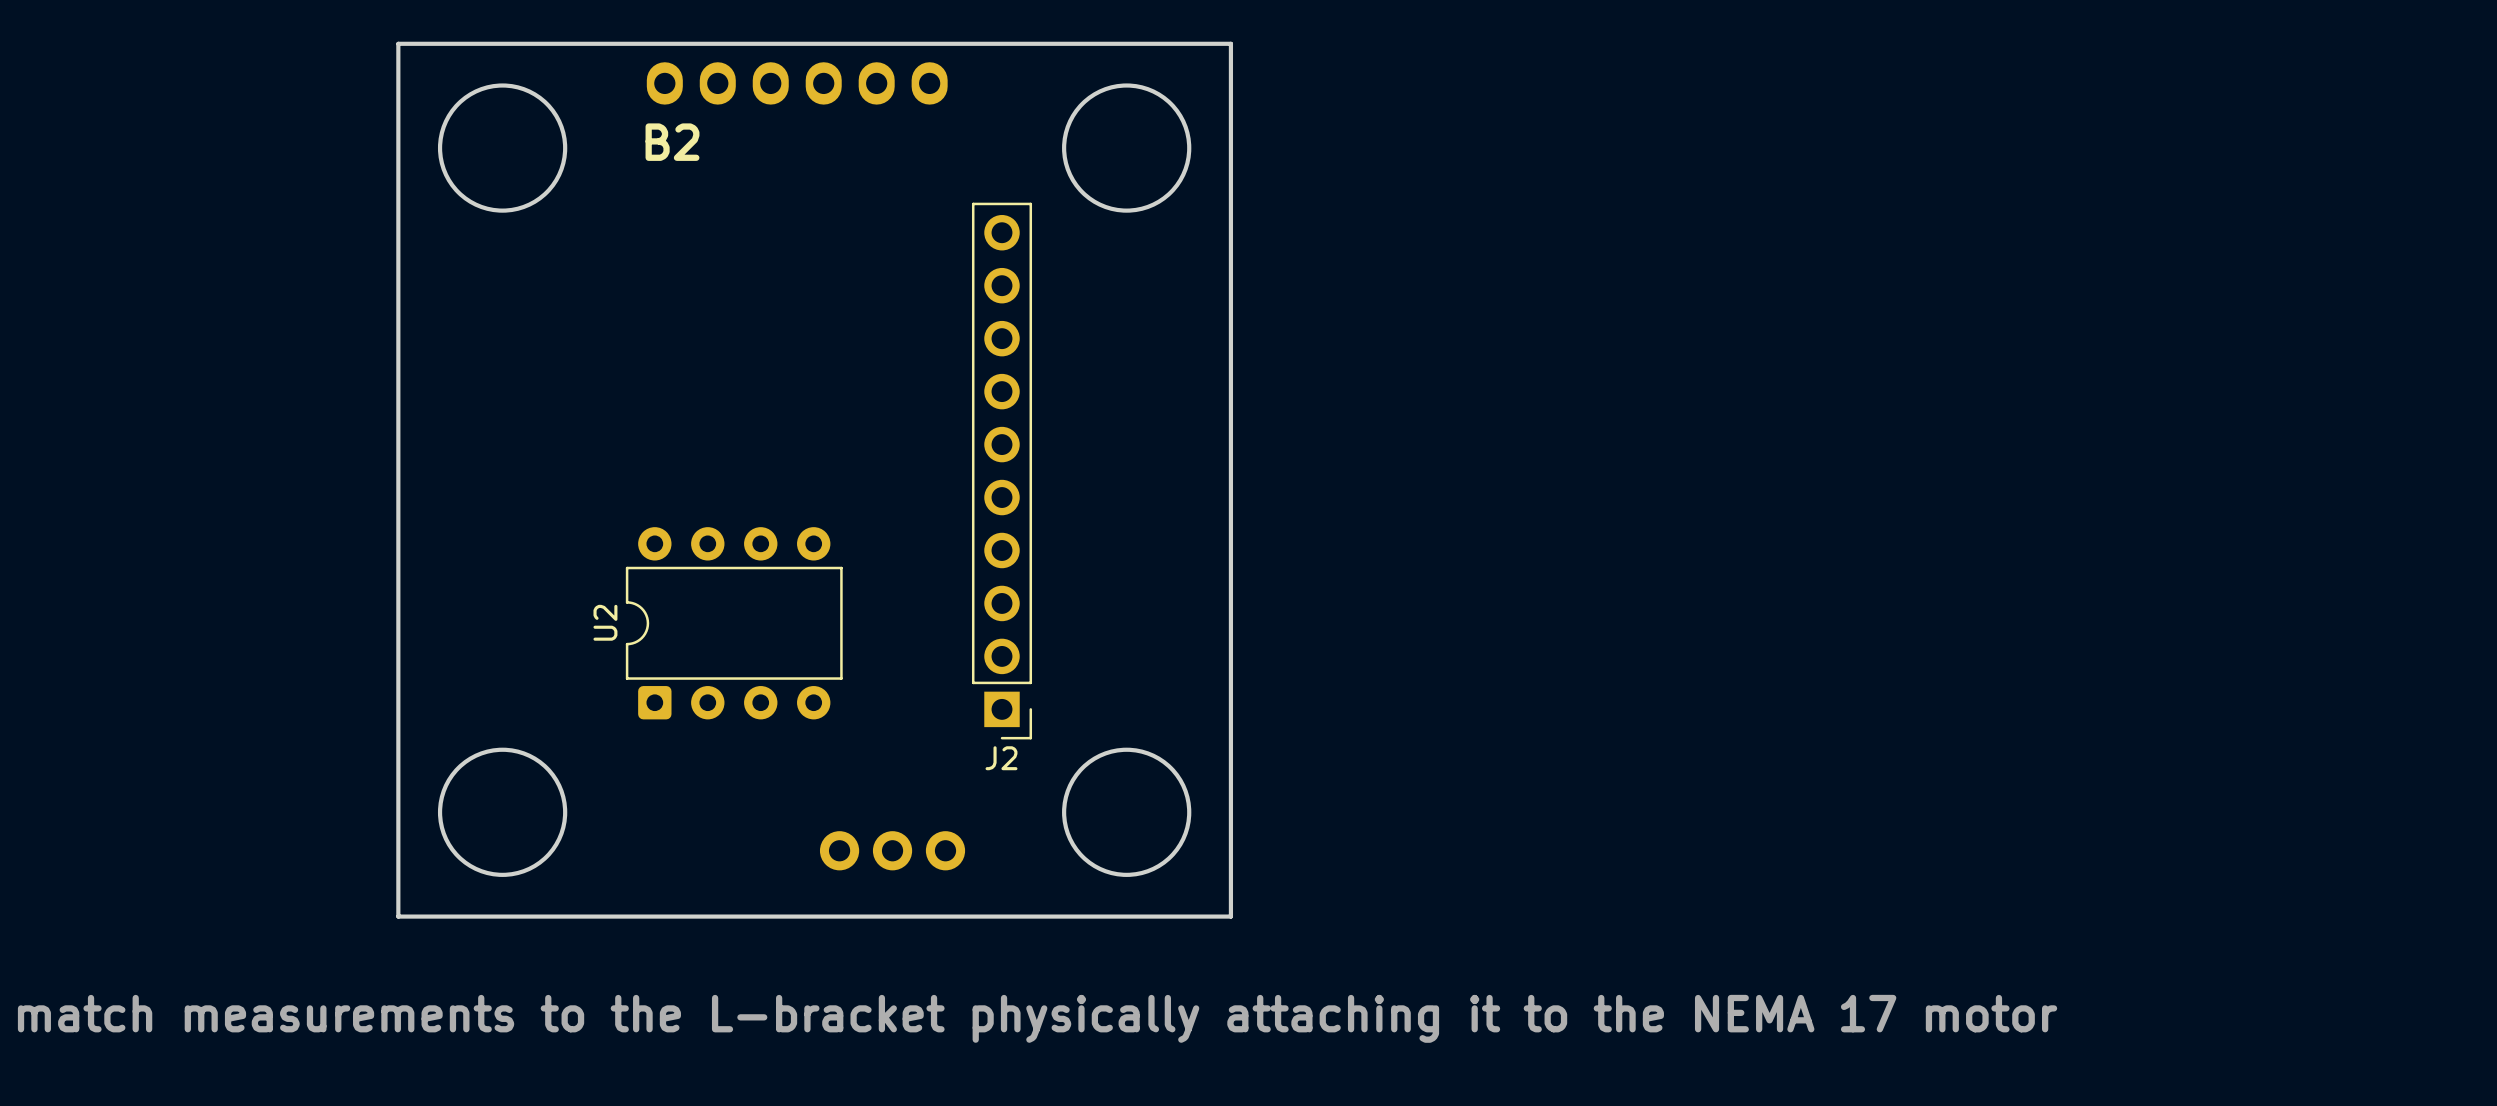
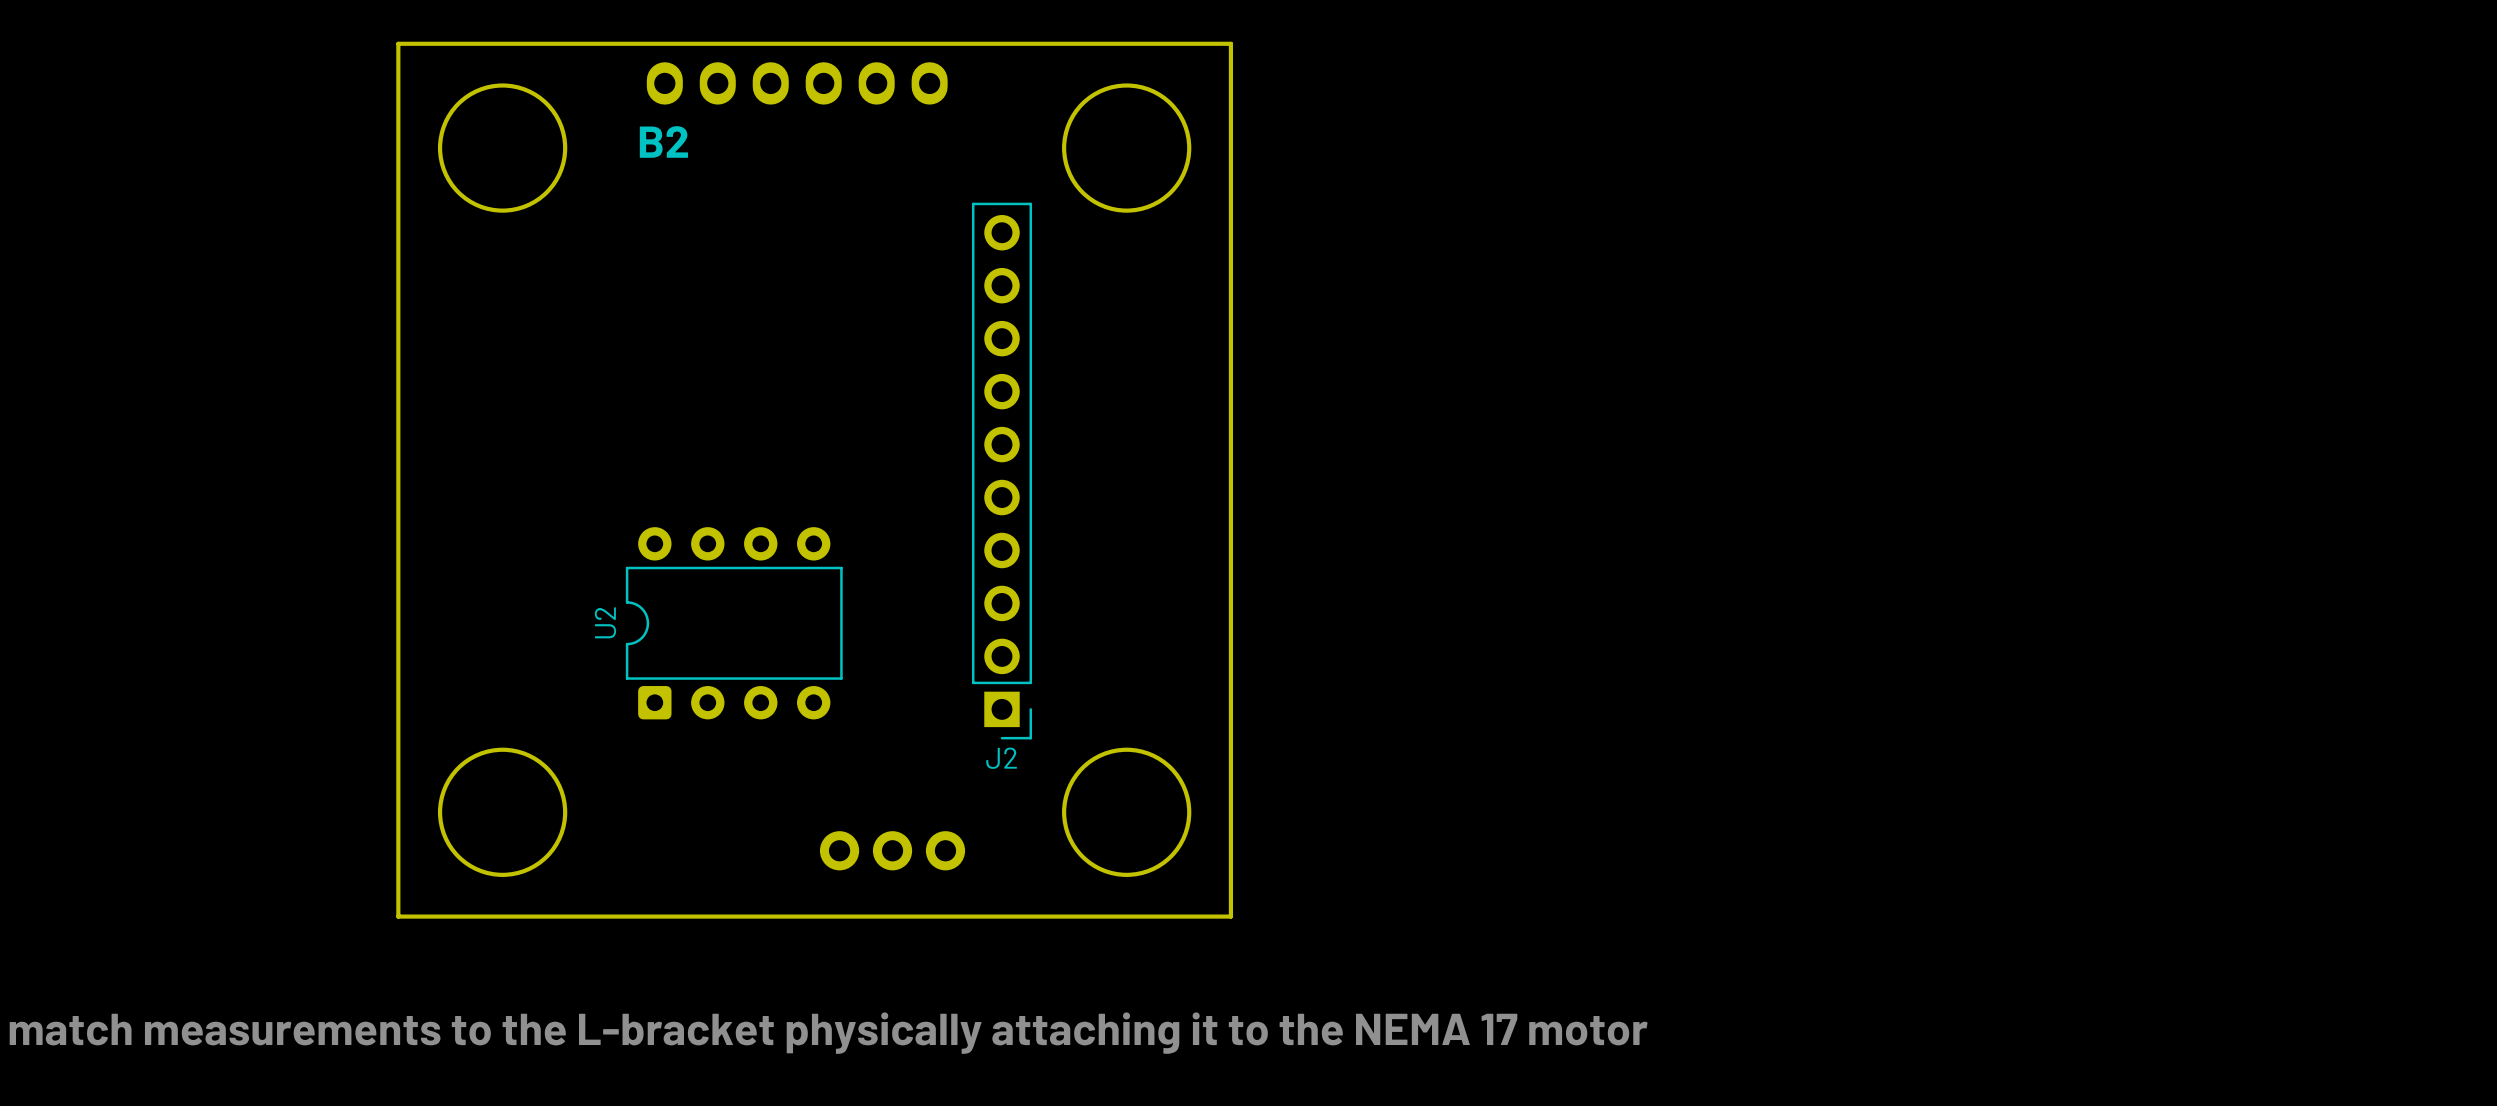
text position: match measurements to the L-bracket physically attaching it to the NEMA 17 motor (1037, 1018) -> match measurements to the L-bracket physically attaching it to the NEMA 17 motor (828, 1033)

